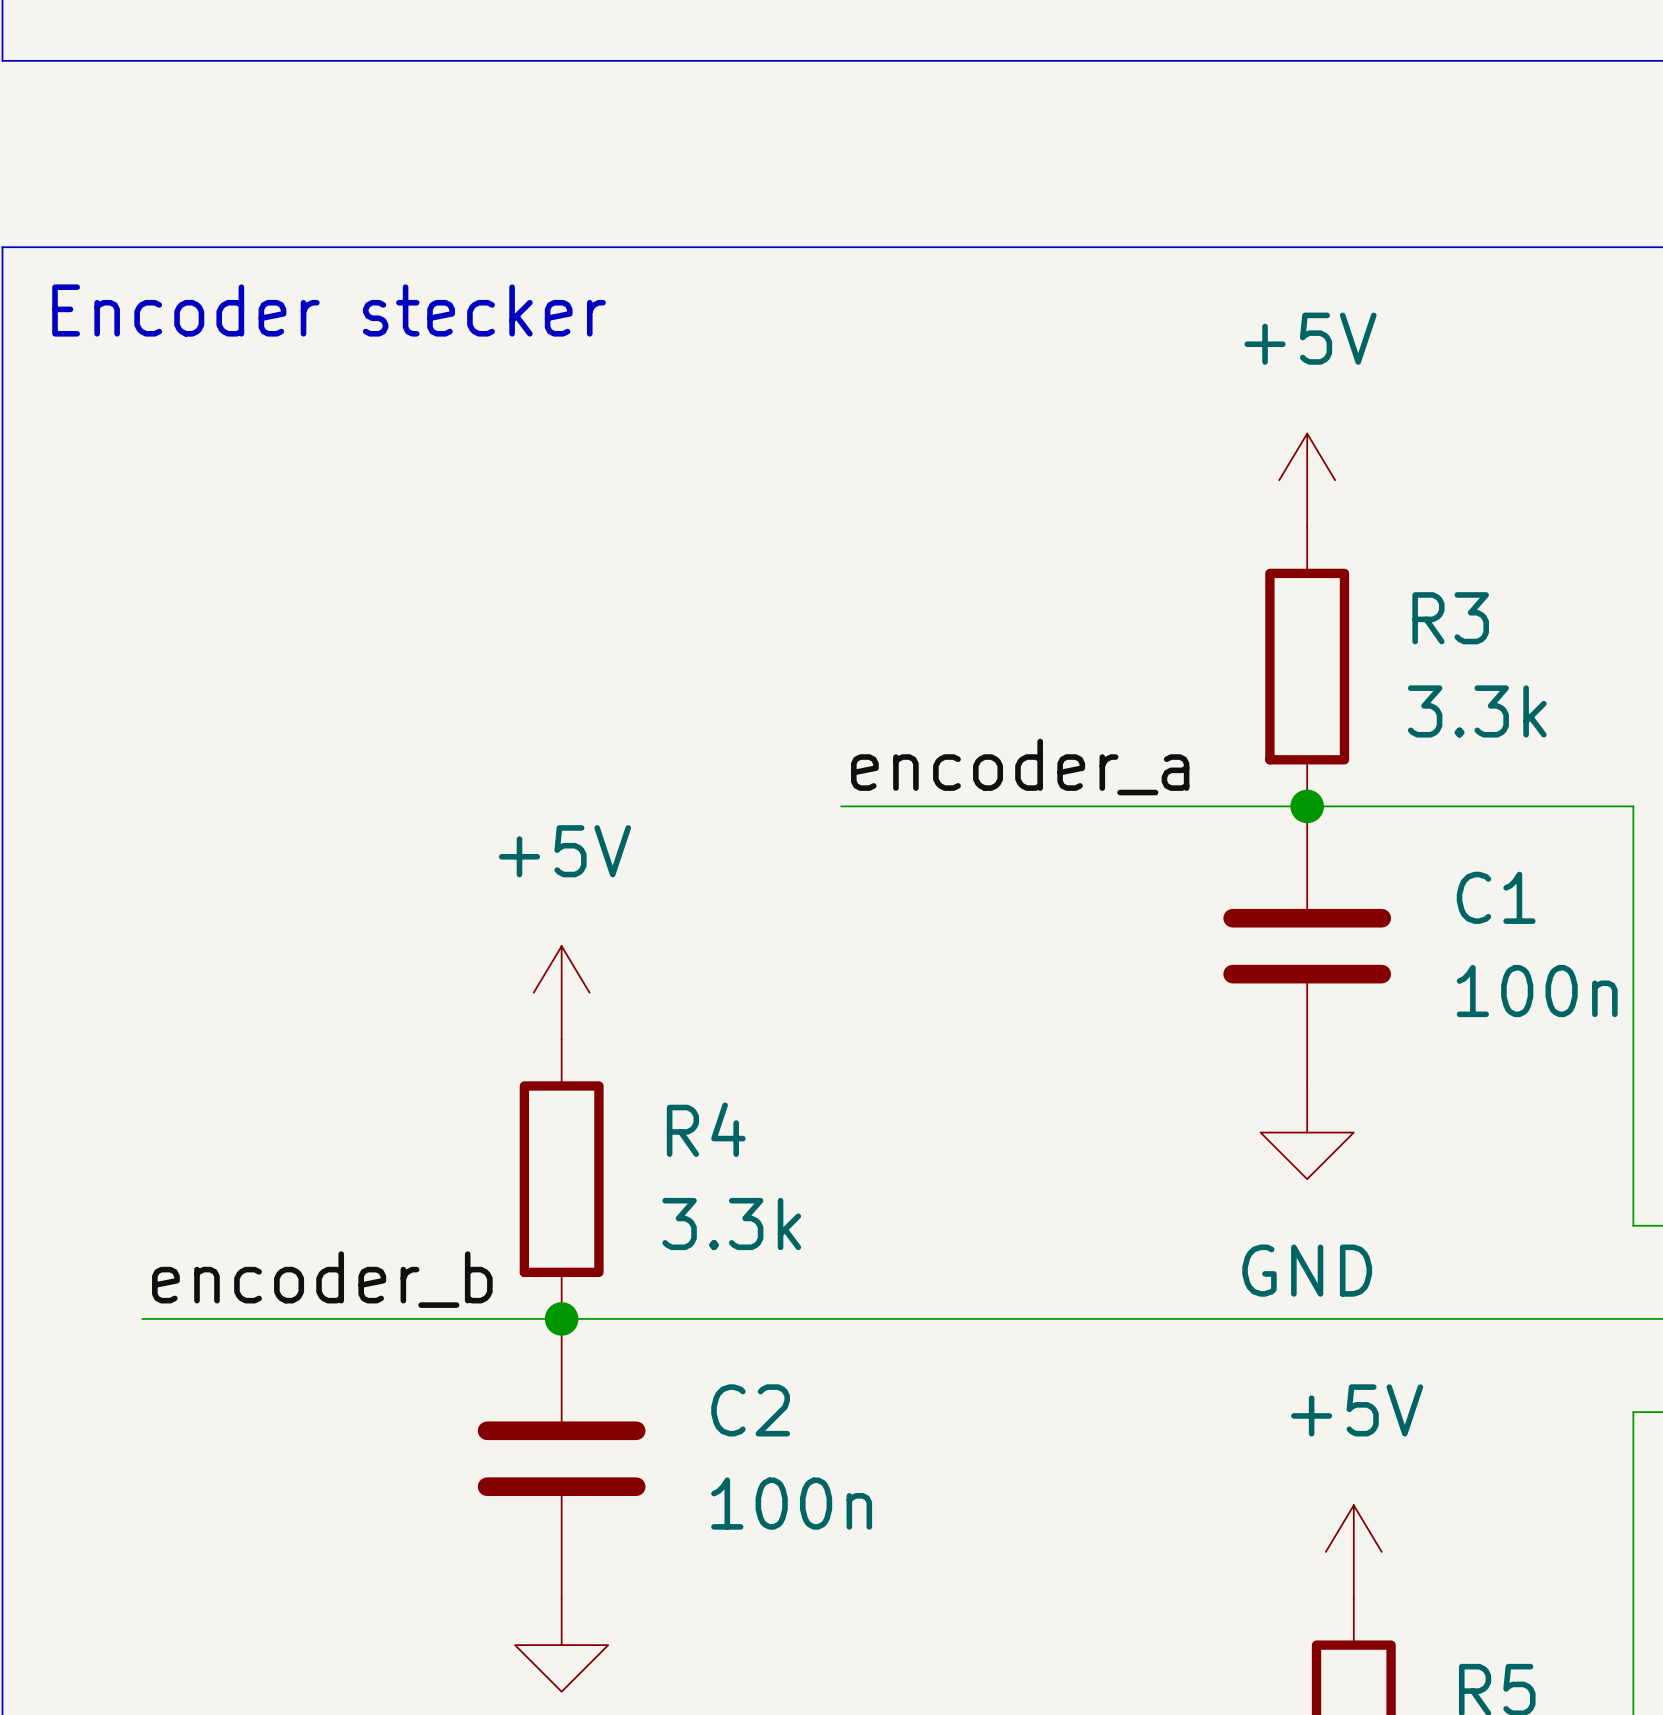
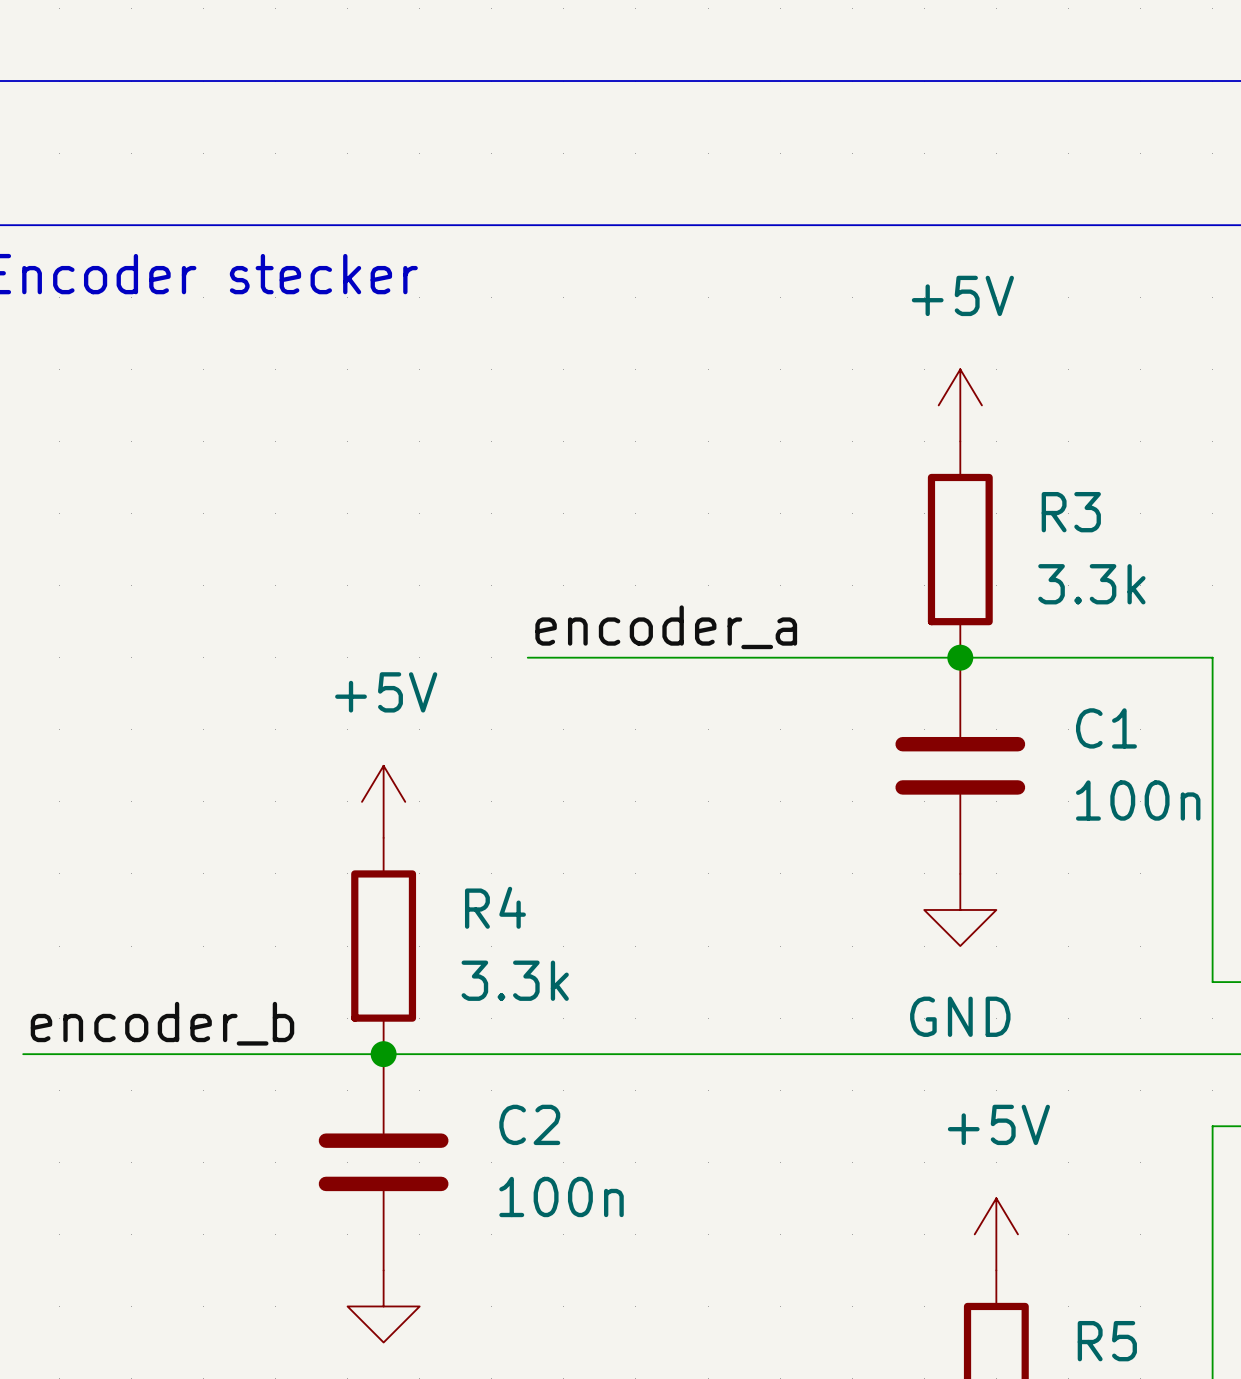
label position: encoder_a (1020, 767) -> encoder_a (666, 627)
wire: none -> (527, 657) (599, 657)
label position: encoder_b (322, 1279) -> encoder_b (162, 1023)
wire: none -> (23, 1054) (59, 1054)

